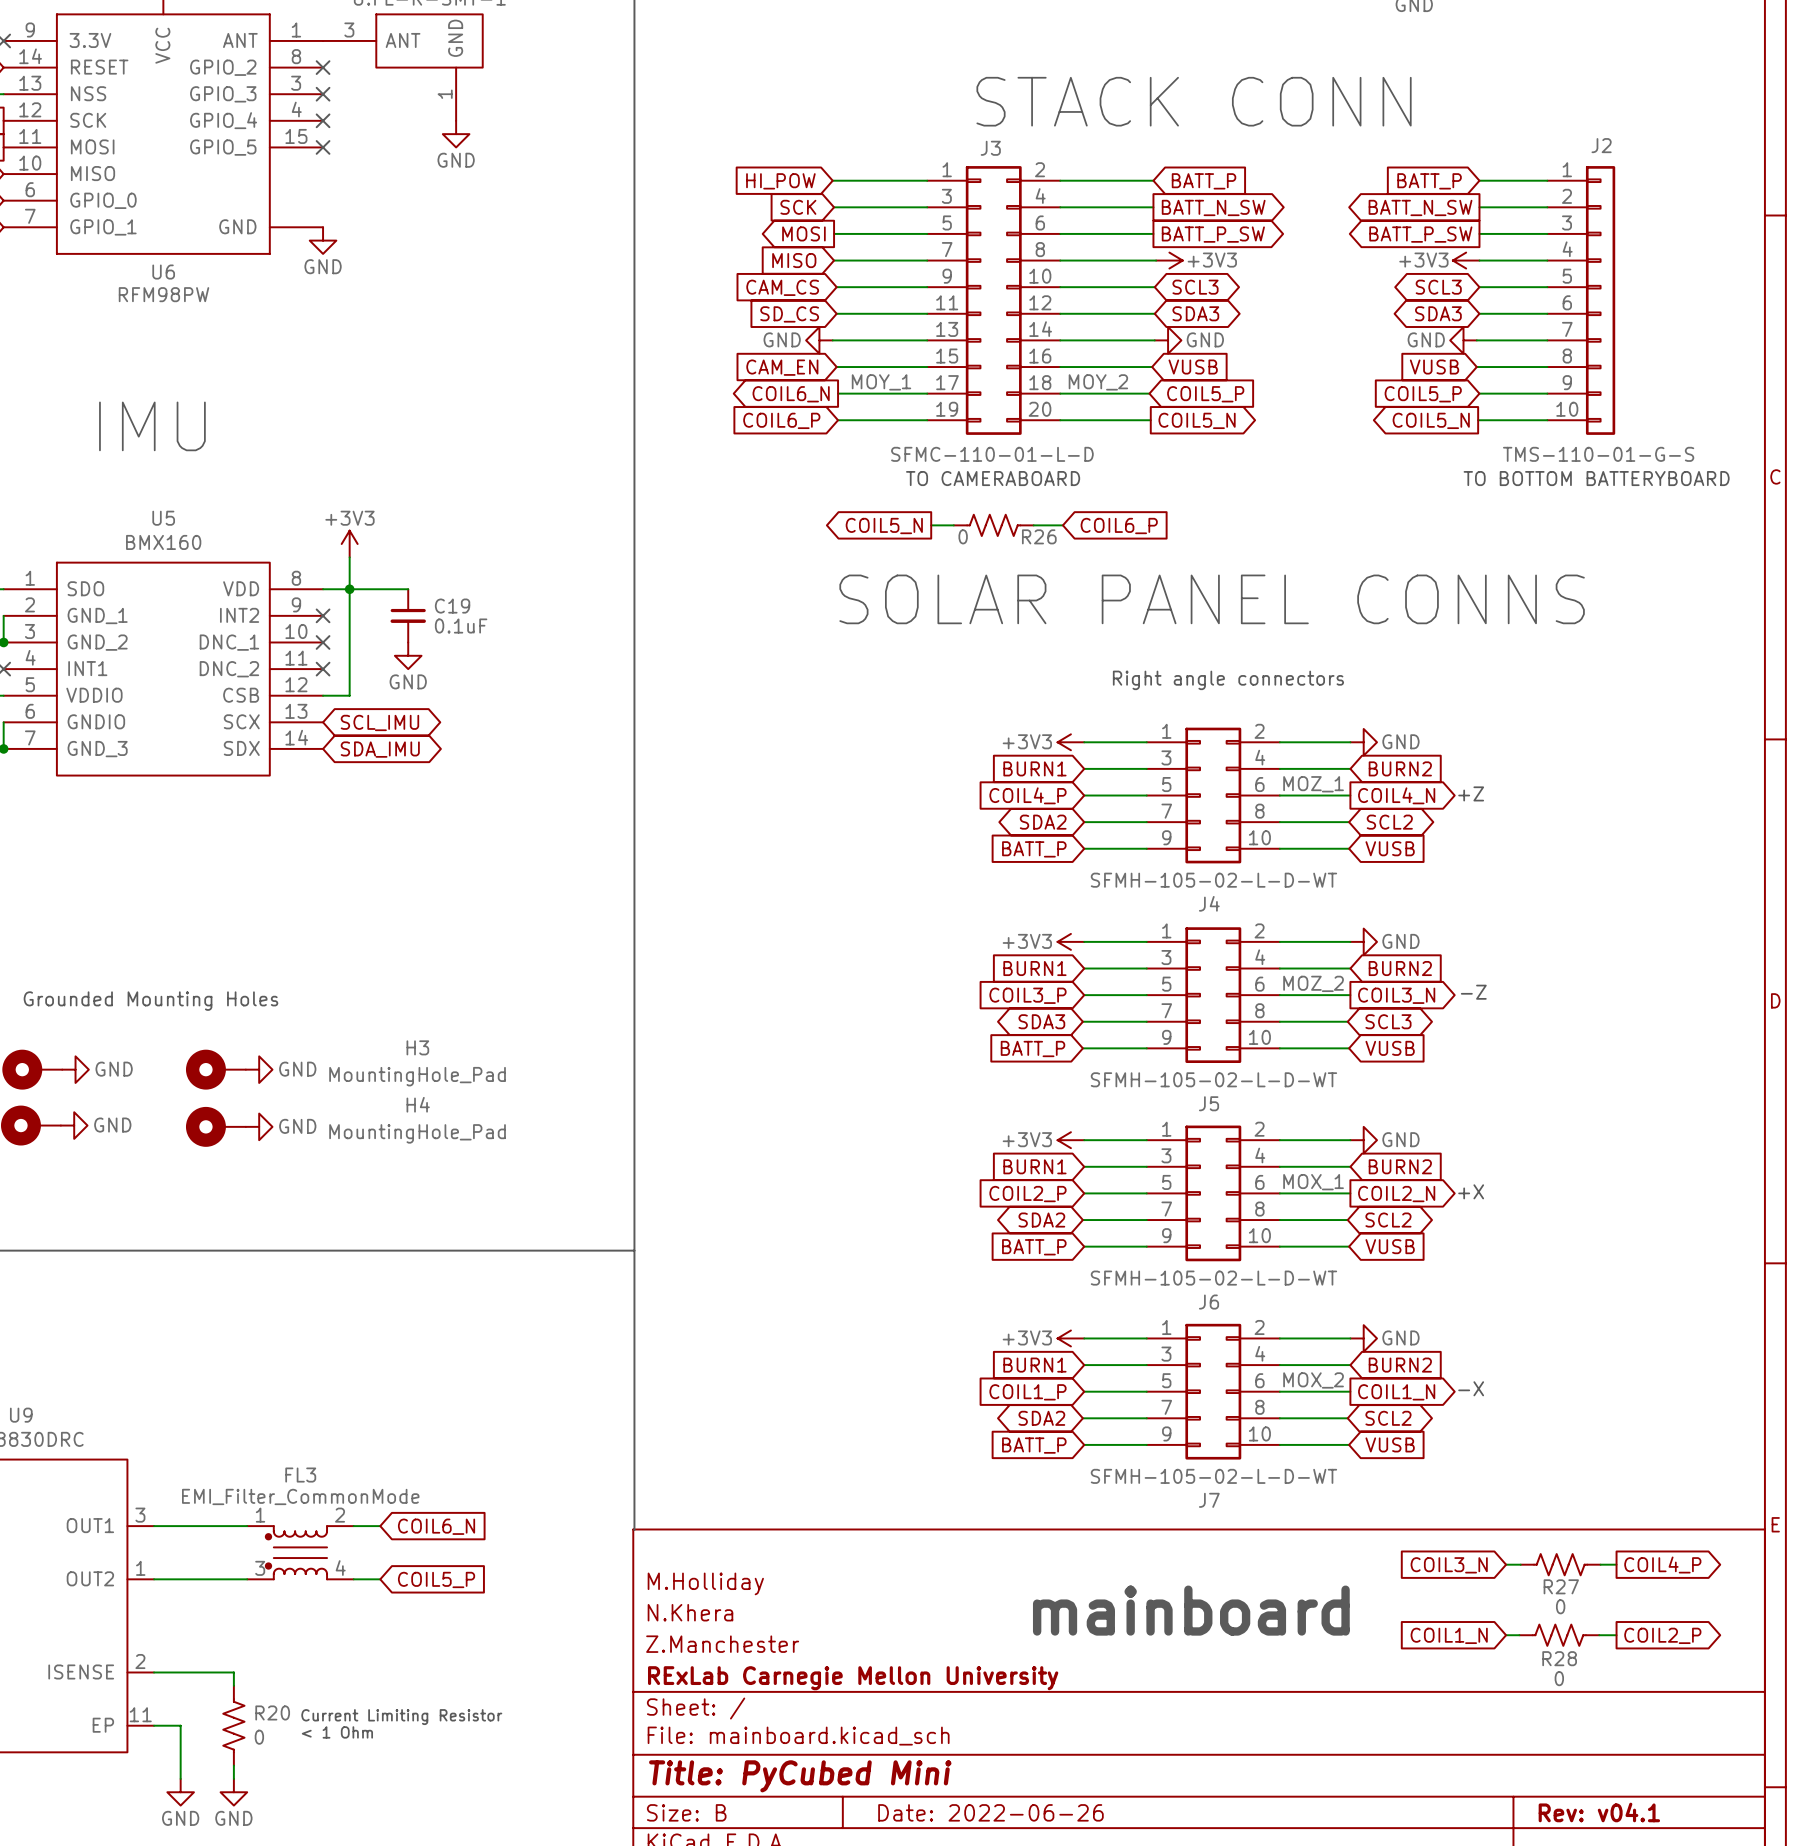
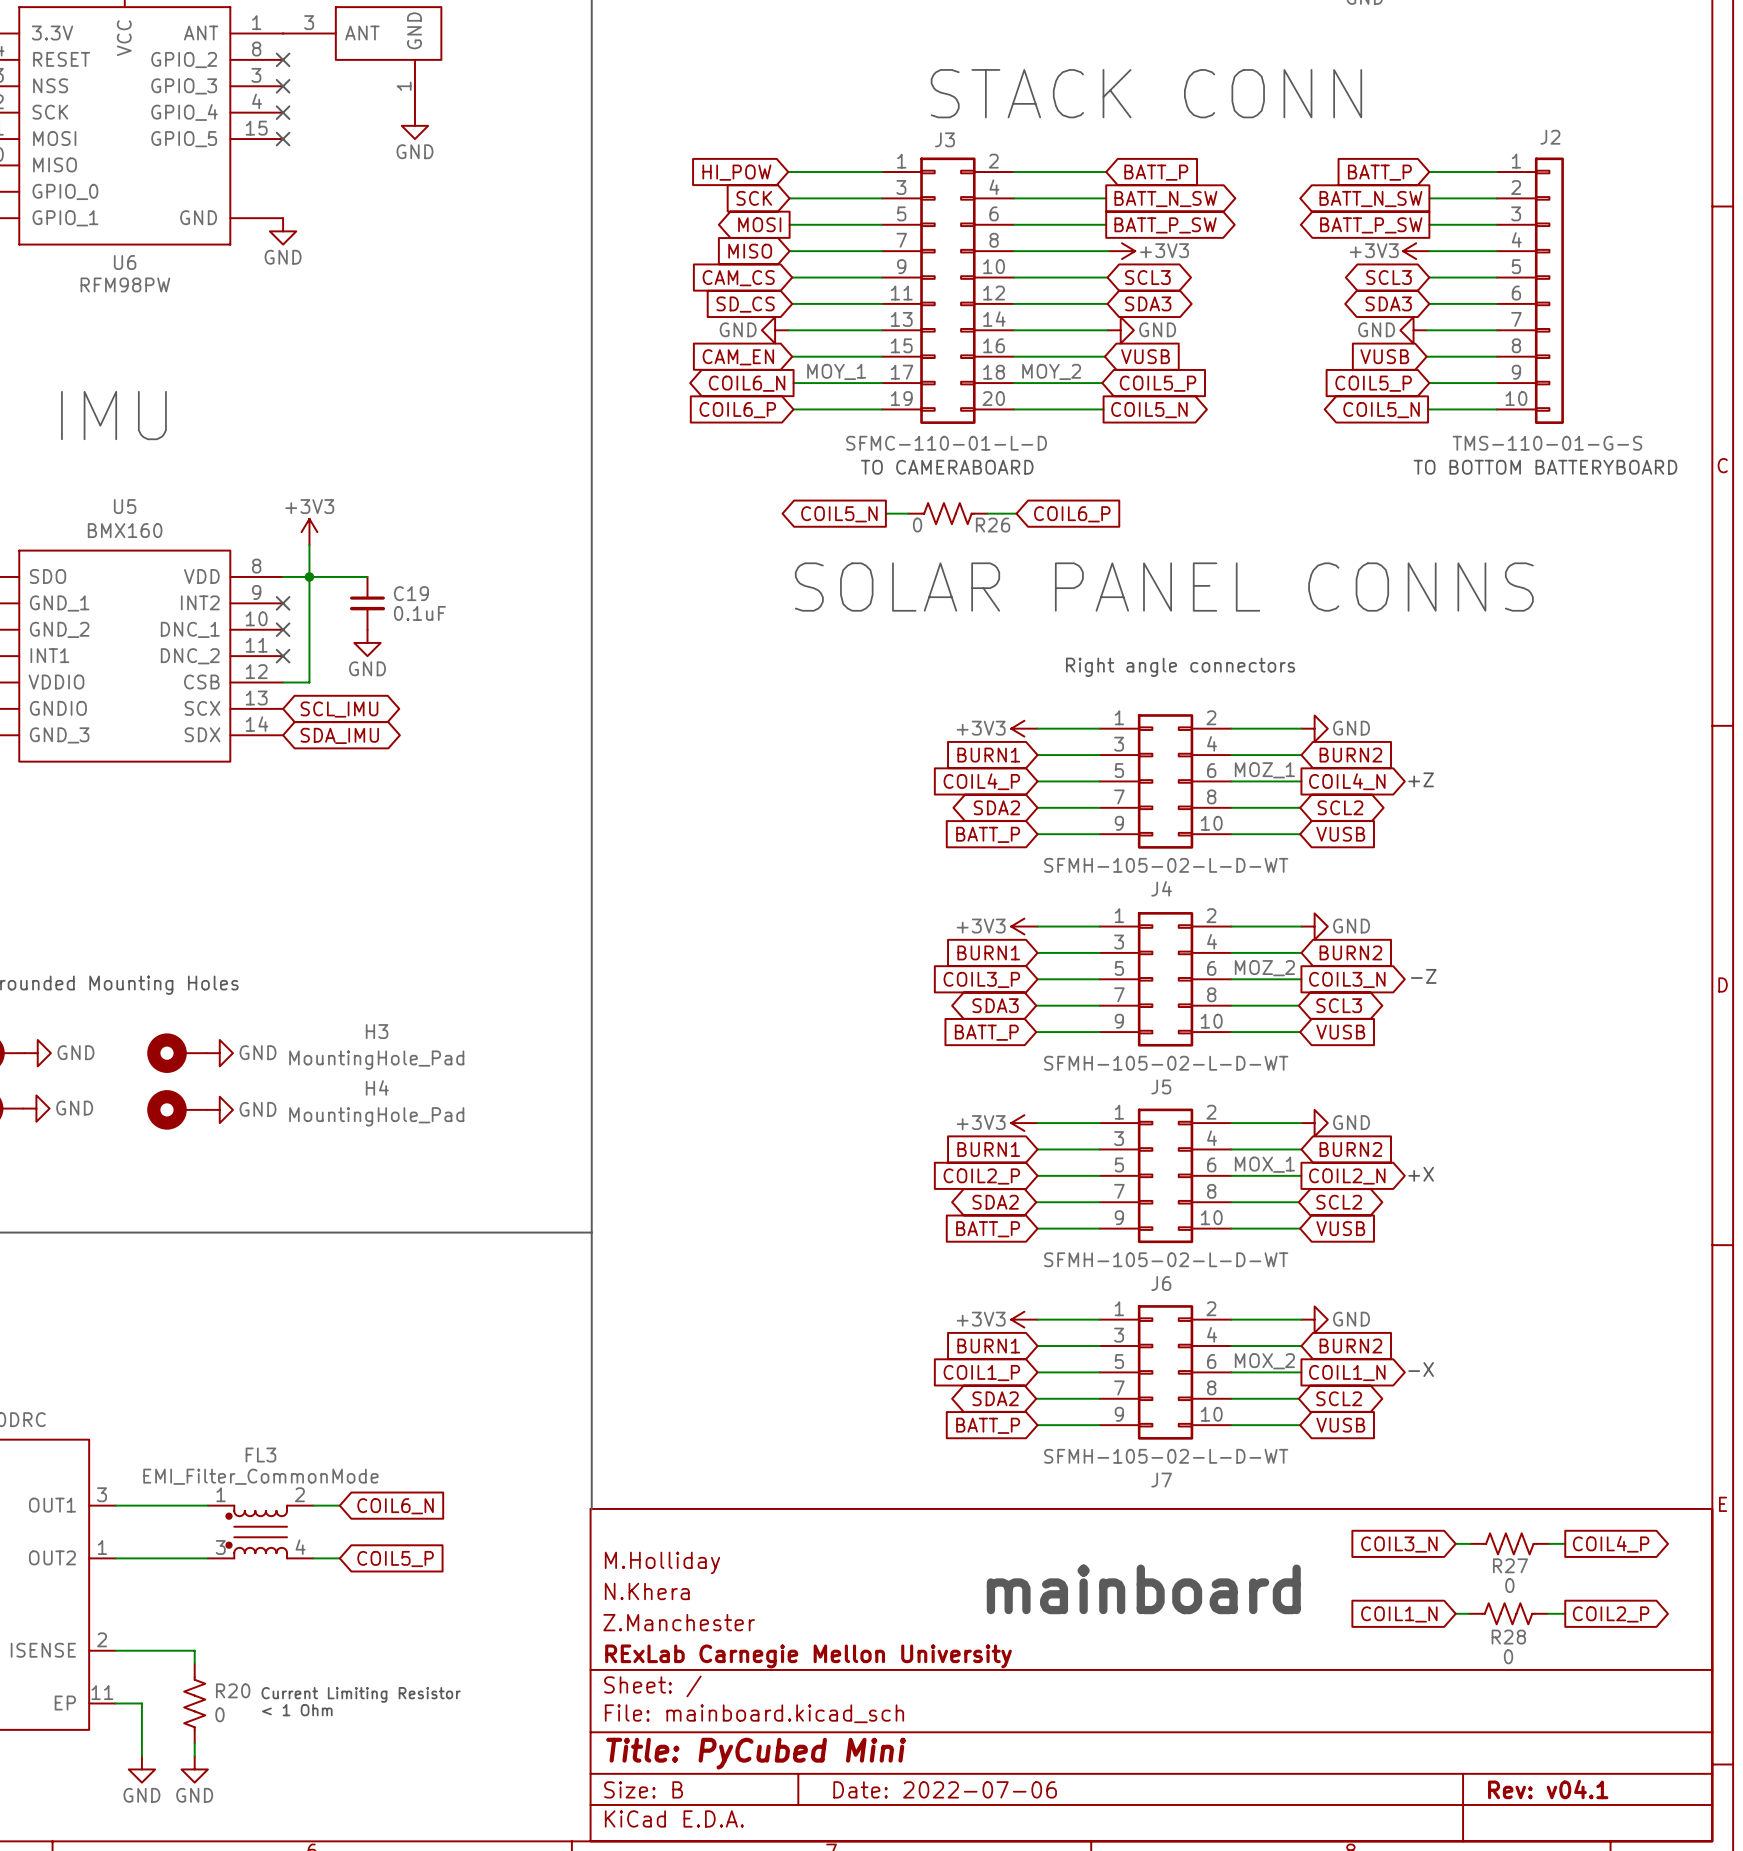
title block: Date: 2022-06-26 (990, 1812) -> Date: 2022-07-06 (945, 1789)

